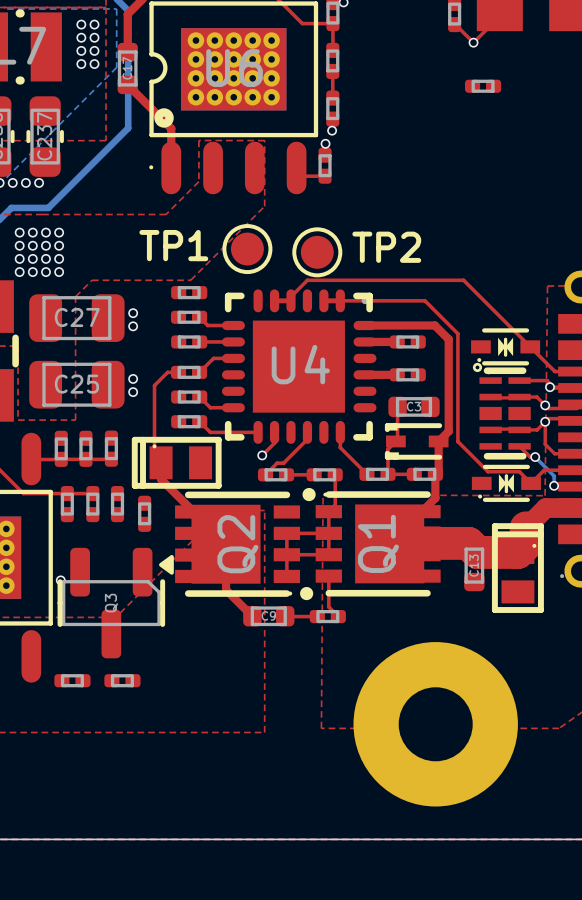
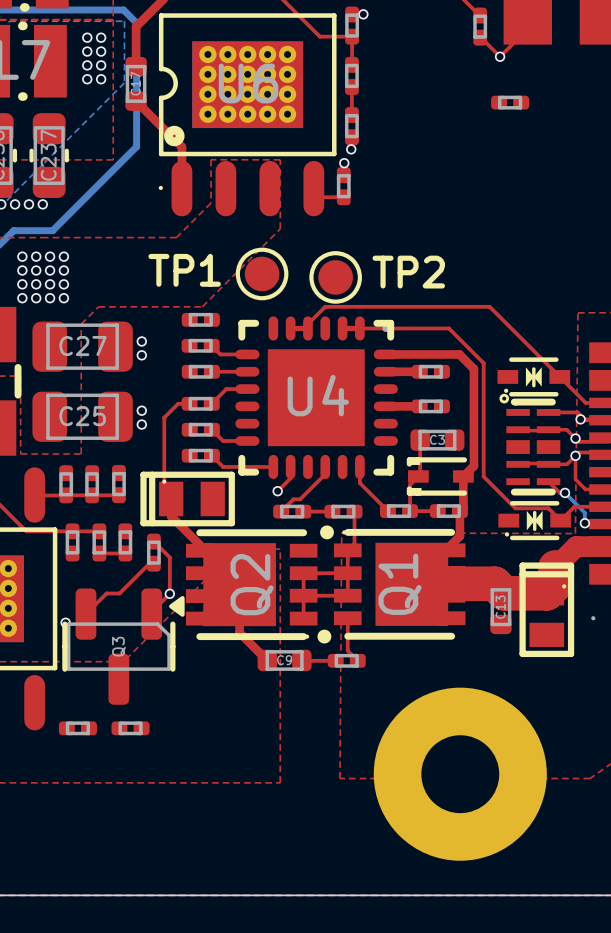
top track: none -> (153, 541) (169, 557) (169, 593) (151, 614)
top track: none -> (99, 553) (125, 553)
top track: none -> (153, 563) (149, 563) (119, 593) (106, 593) (85, 614)
via: none -> (169, 593)

